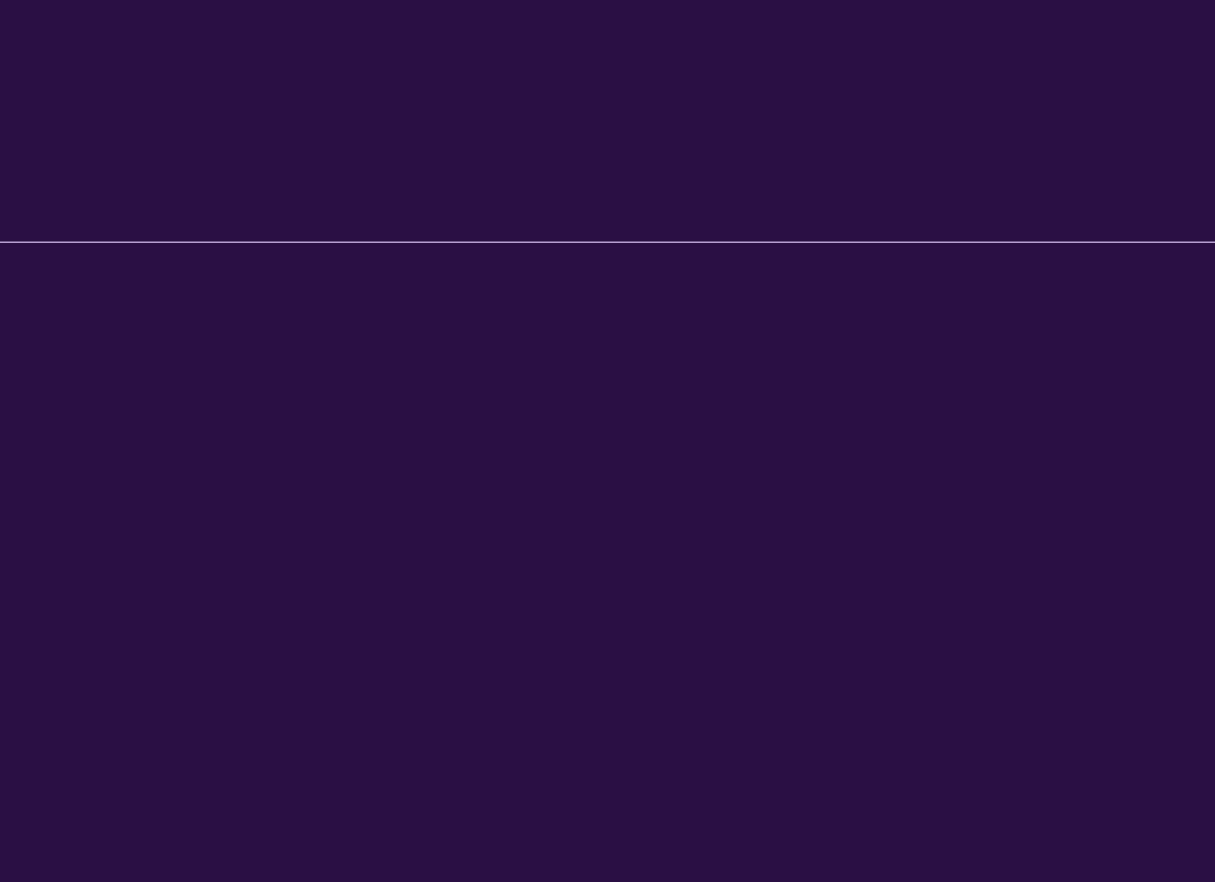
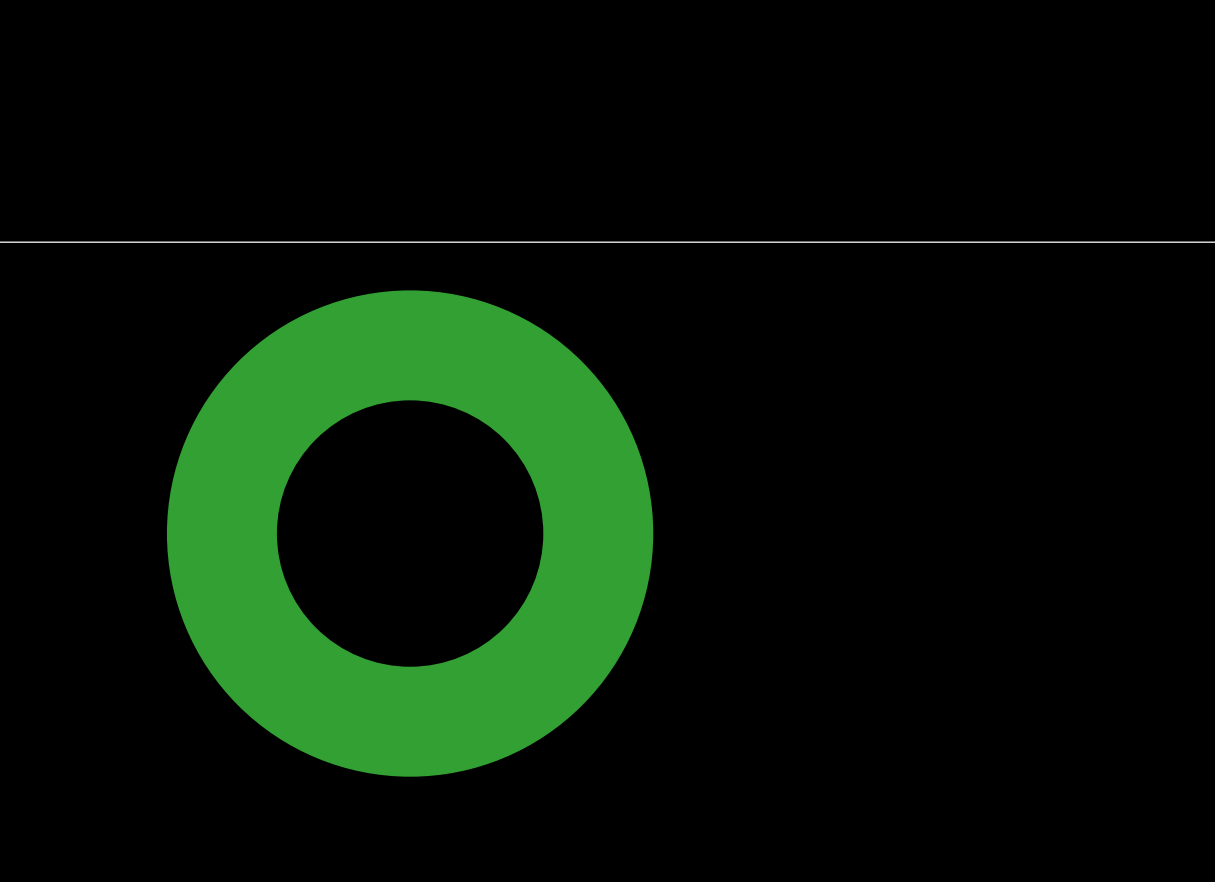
part: none -> (410, 533)

